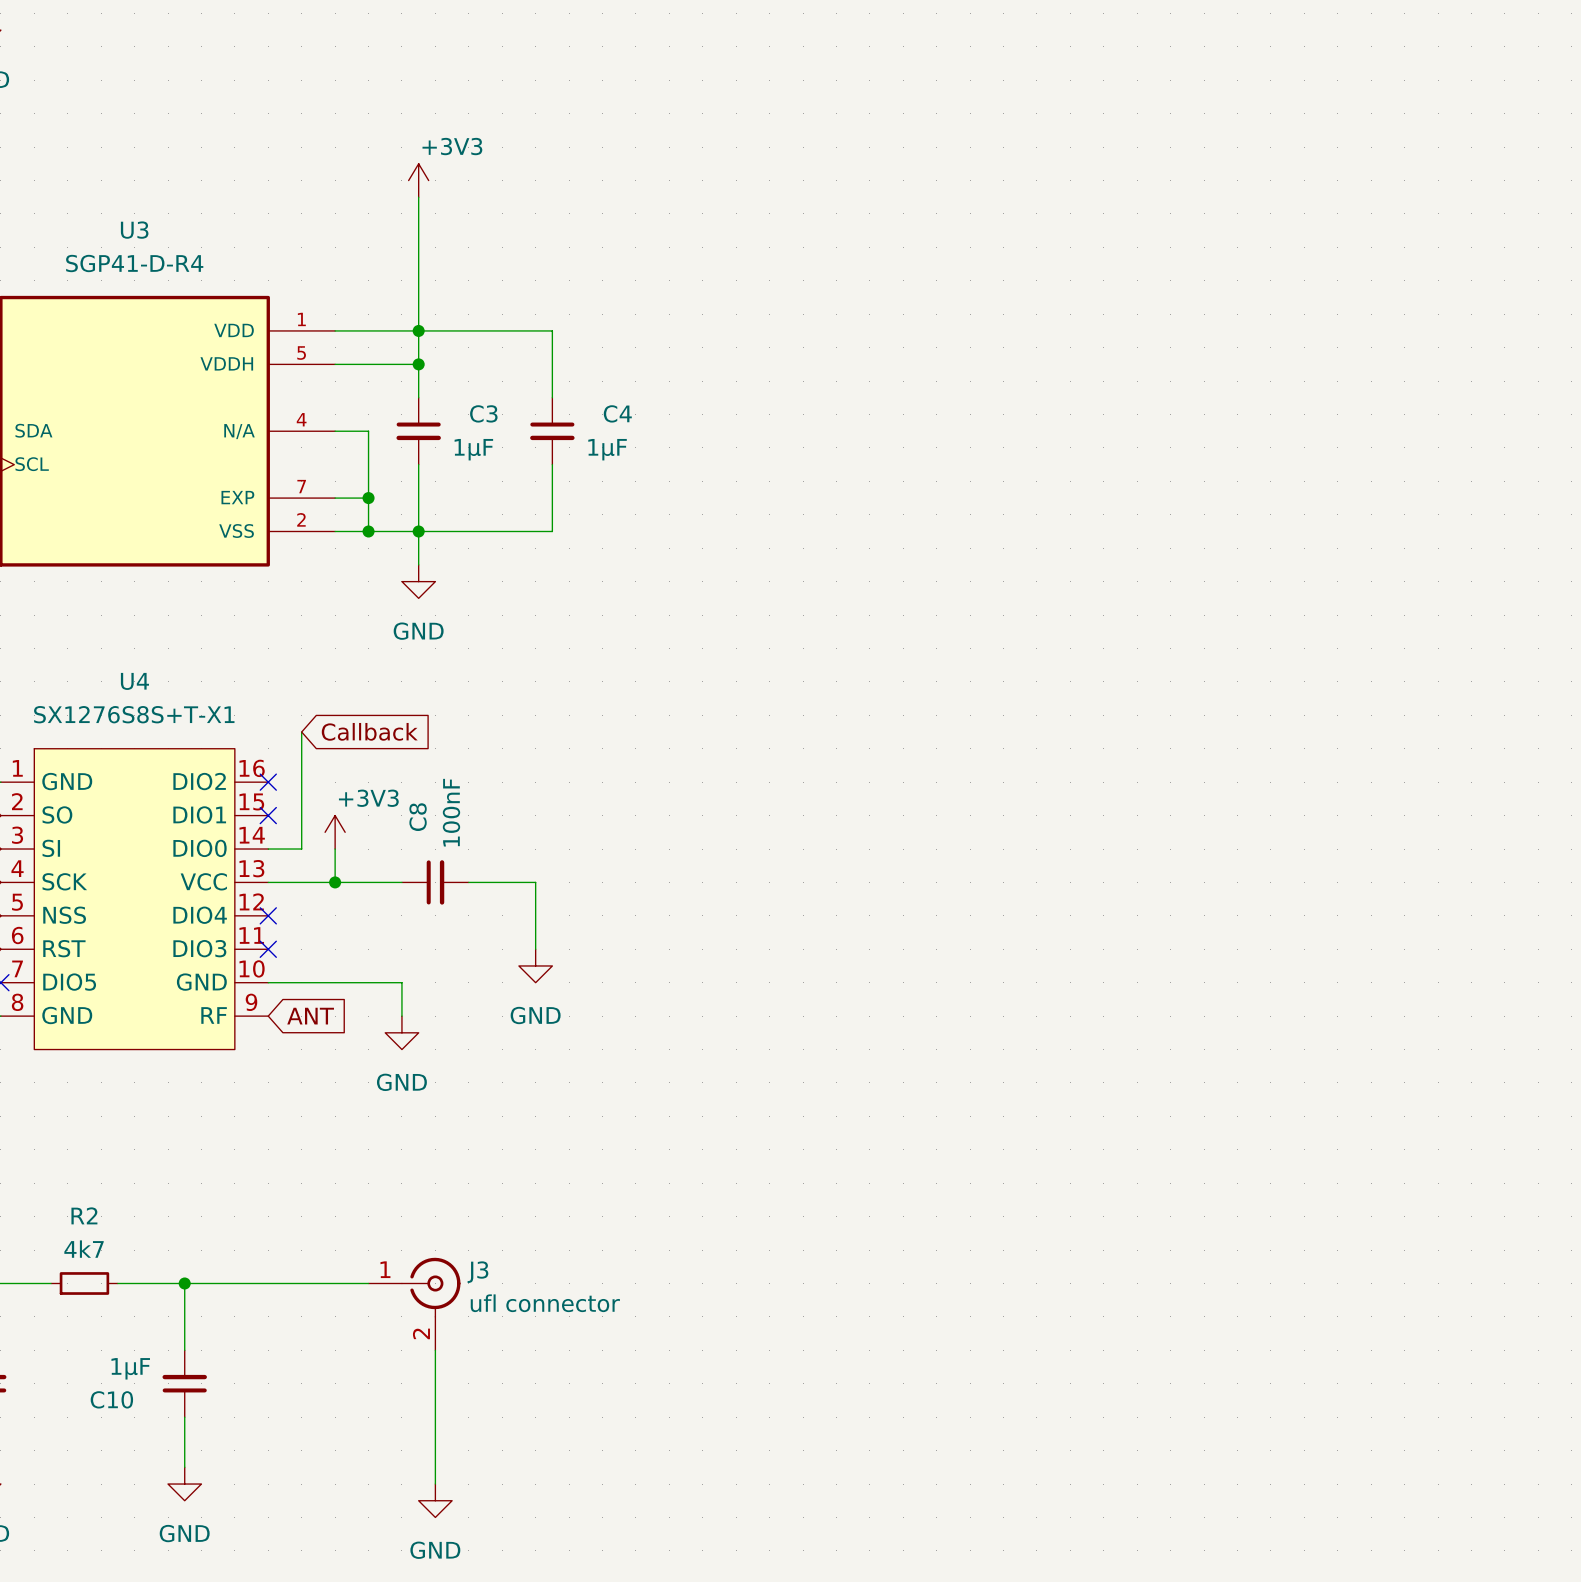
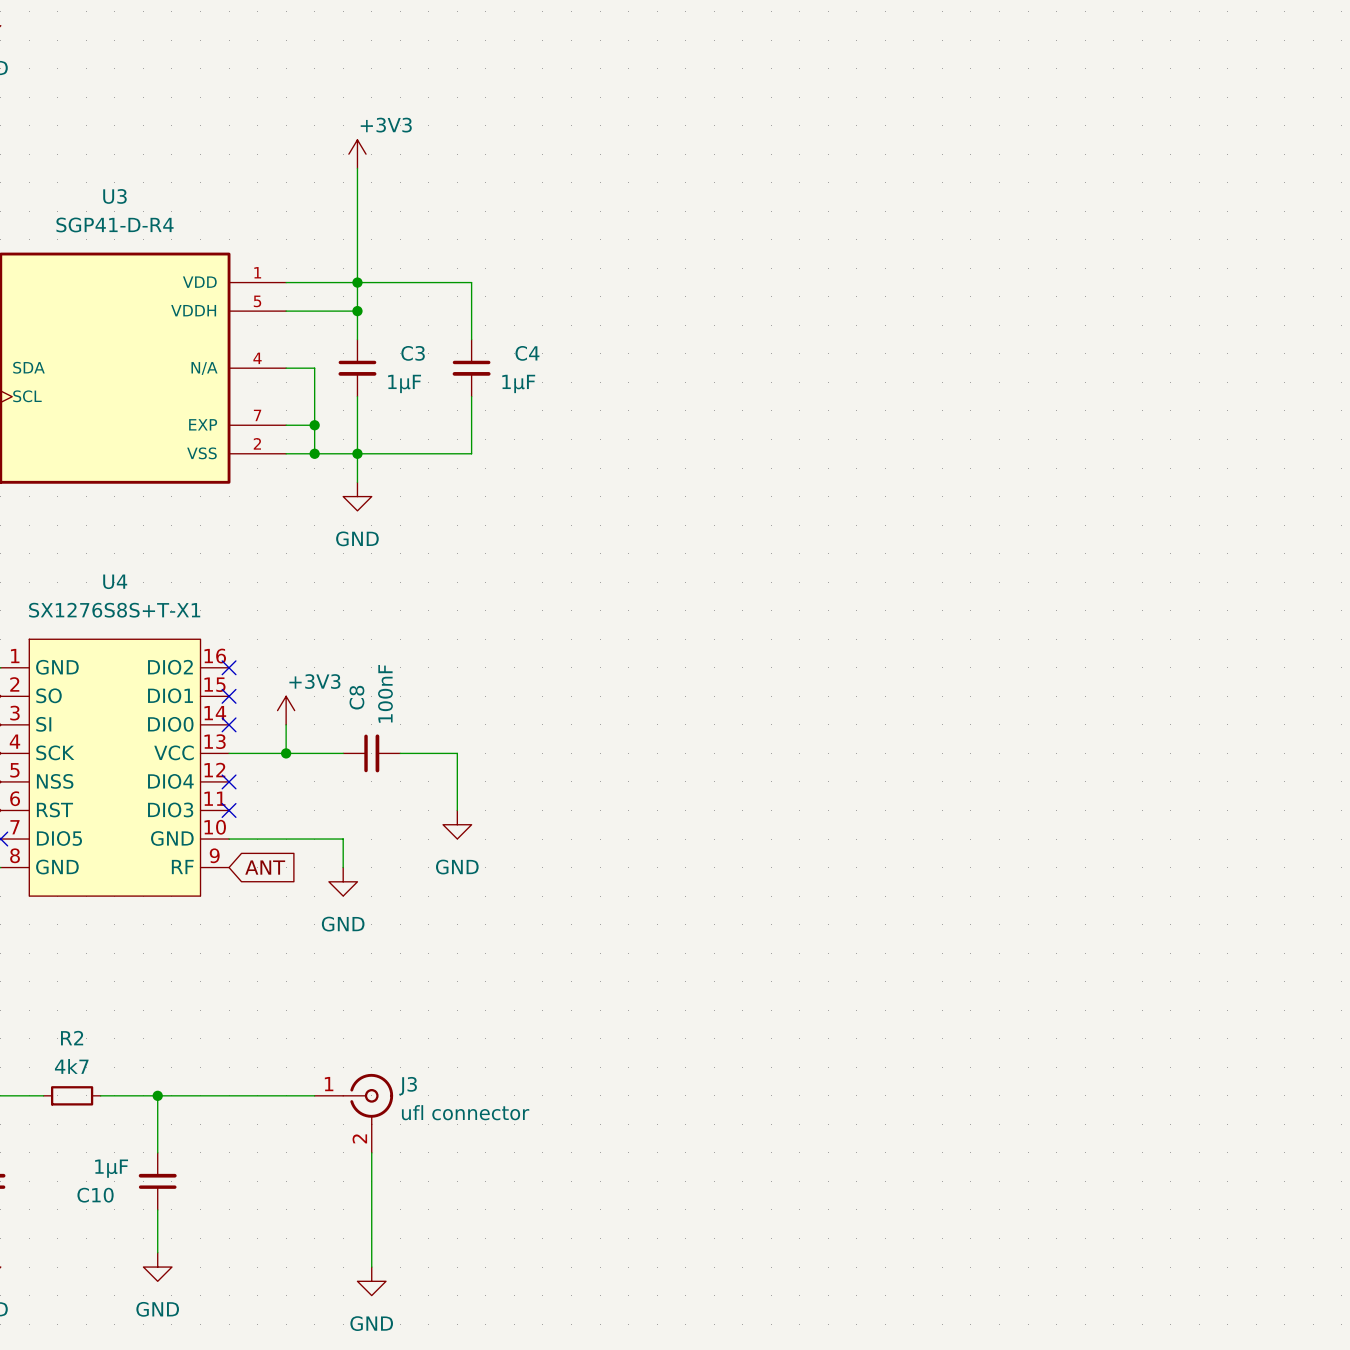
global label: Callback (369, 731) -> none
wire: (301, 732) (301, 849) (268, 849) -> none
no-connect mark: none -> (229, 724)

